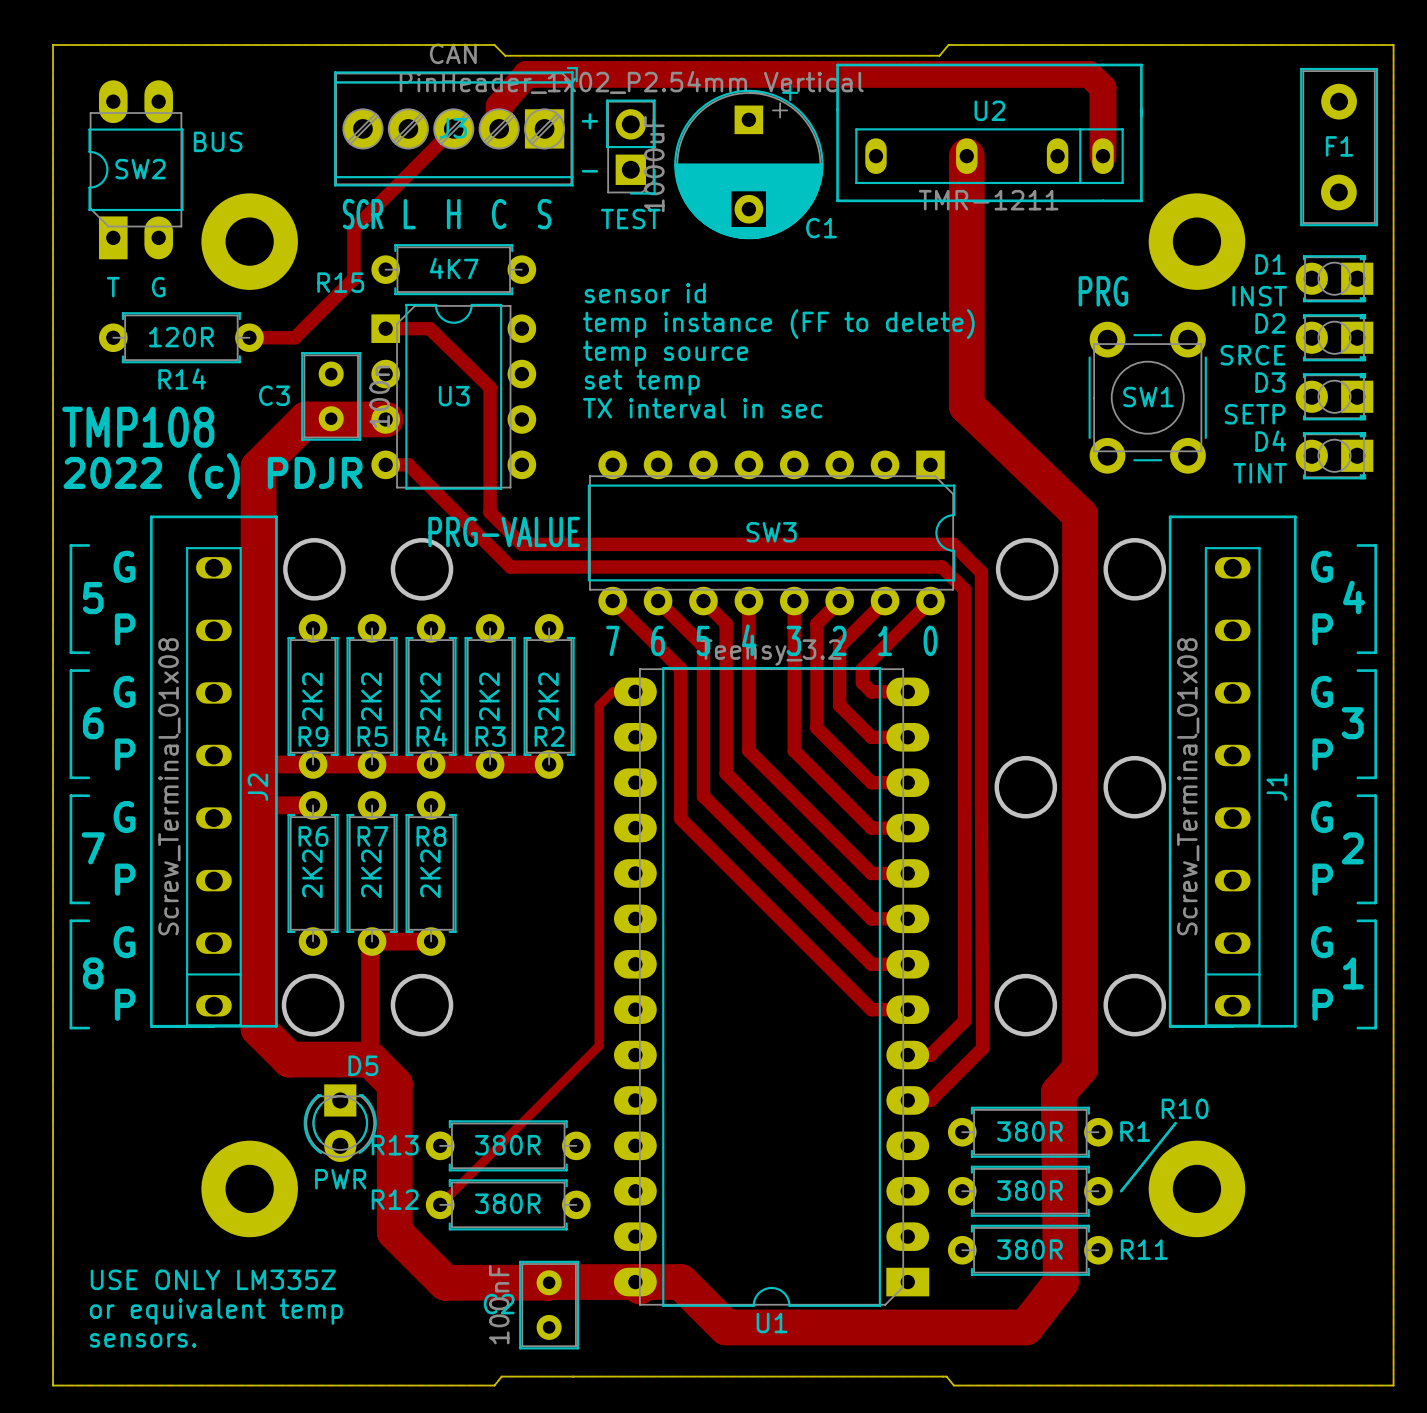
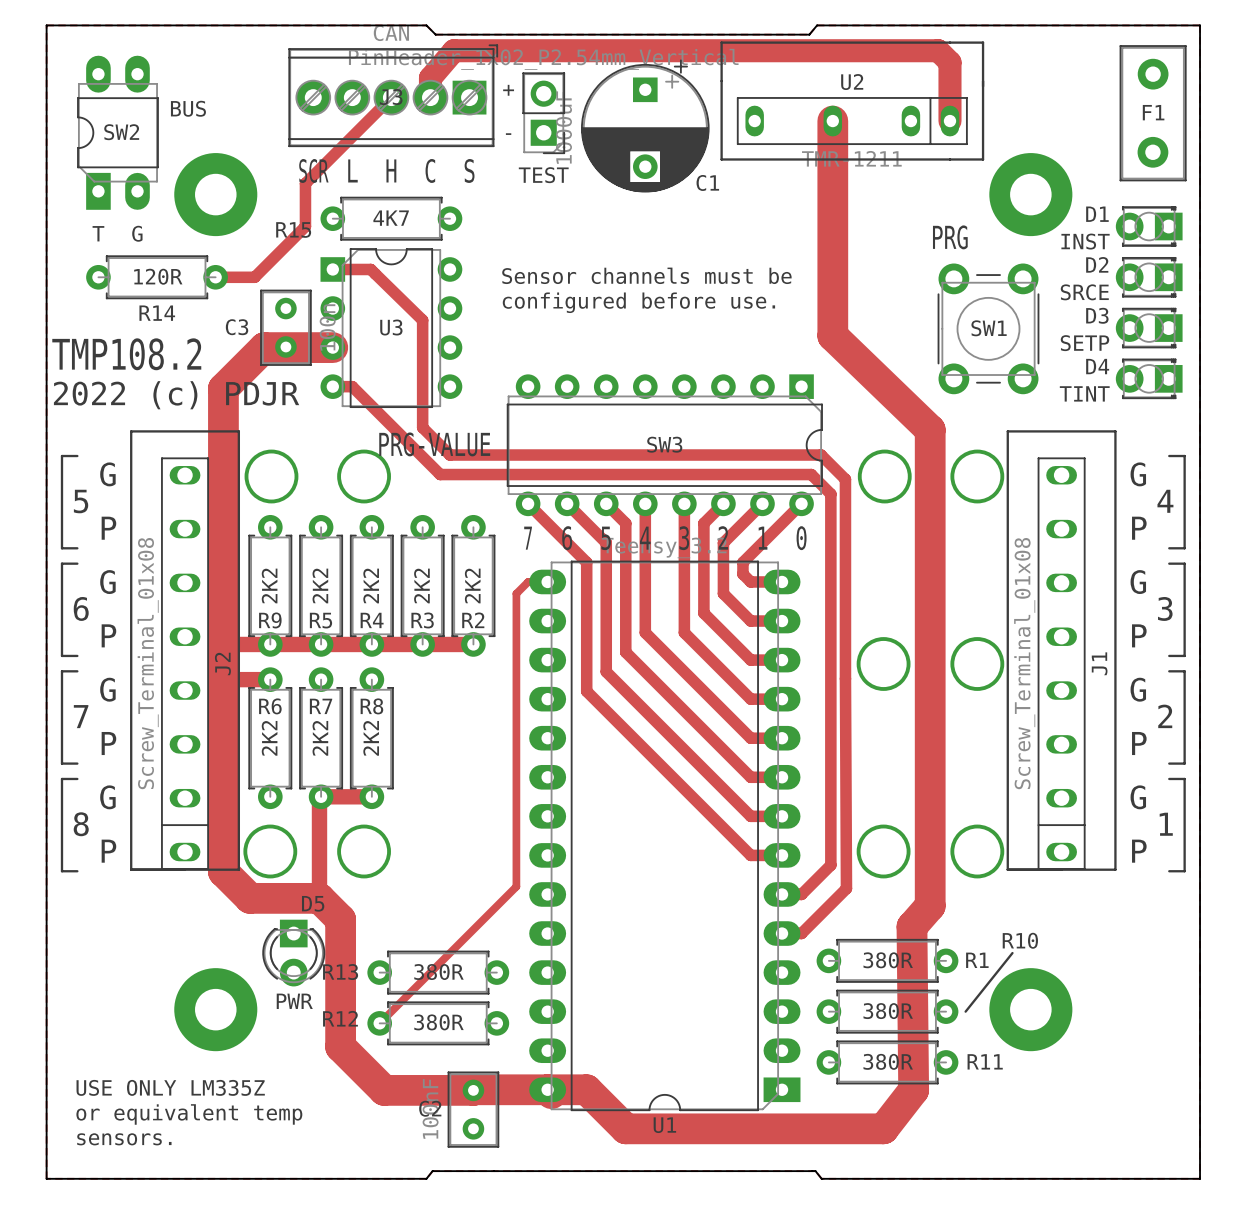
text: sensor id (645, 293) -> none
text: temp instance (FF to delete) (778, 324) -> none
text: none -> Sensor channels must be (646, 275)
text: temp source (665, 353) -> none
text: none -> configured before use. (638, 302)
text: set temp (642, 382) -> none
text: TX interval in sec (702, 408) -> none
text: TMP108 (138, 427) -> TMP108.2 (126, 354)

